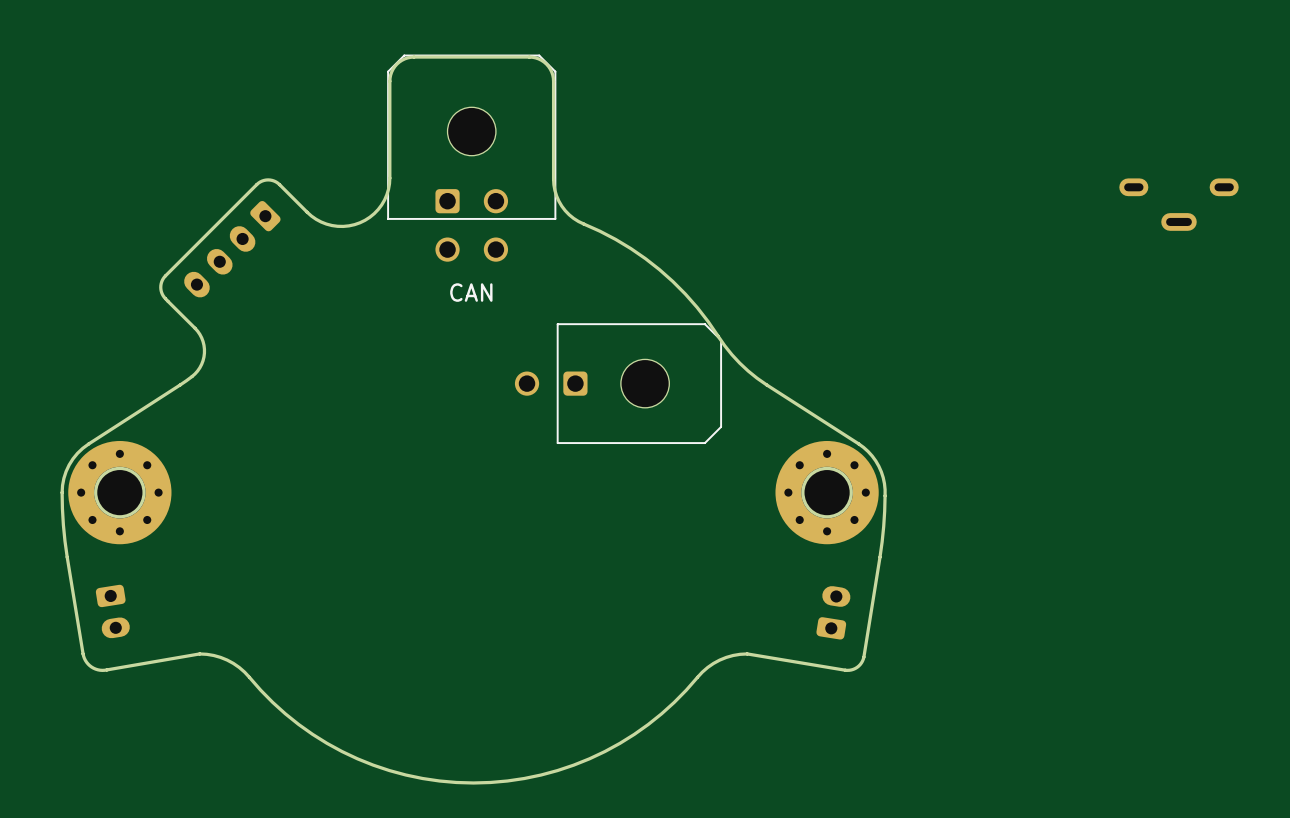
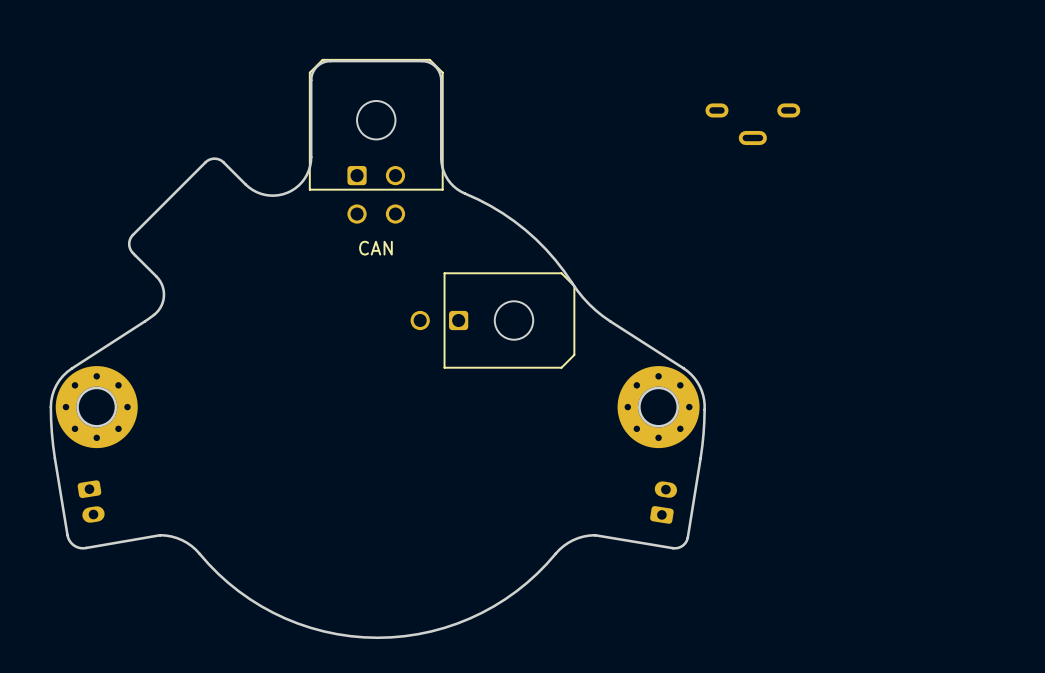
part position: (1179, 204) -> (752, 124)
part: (232, 249) -> none

